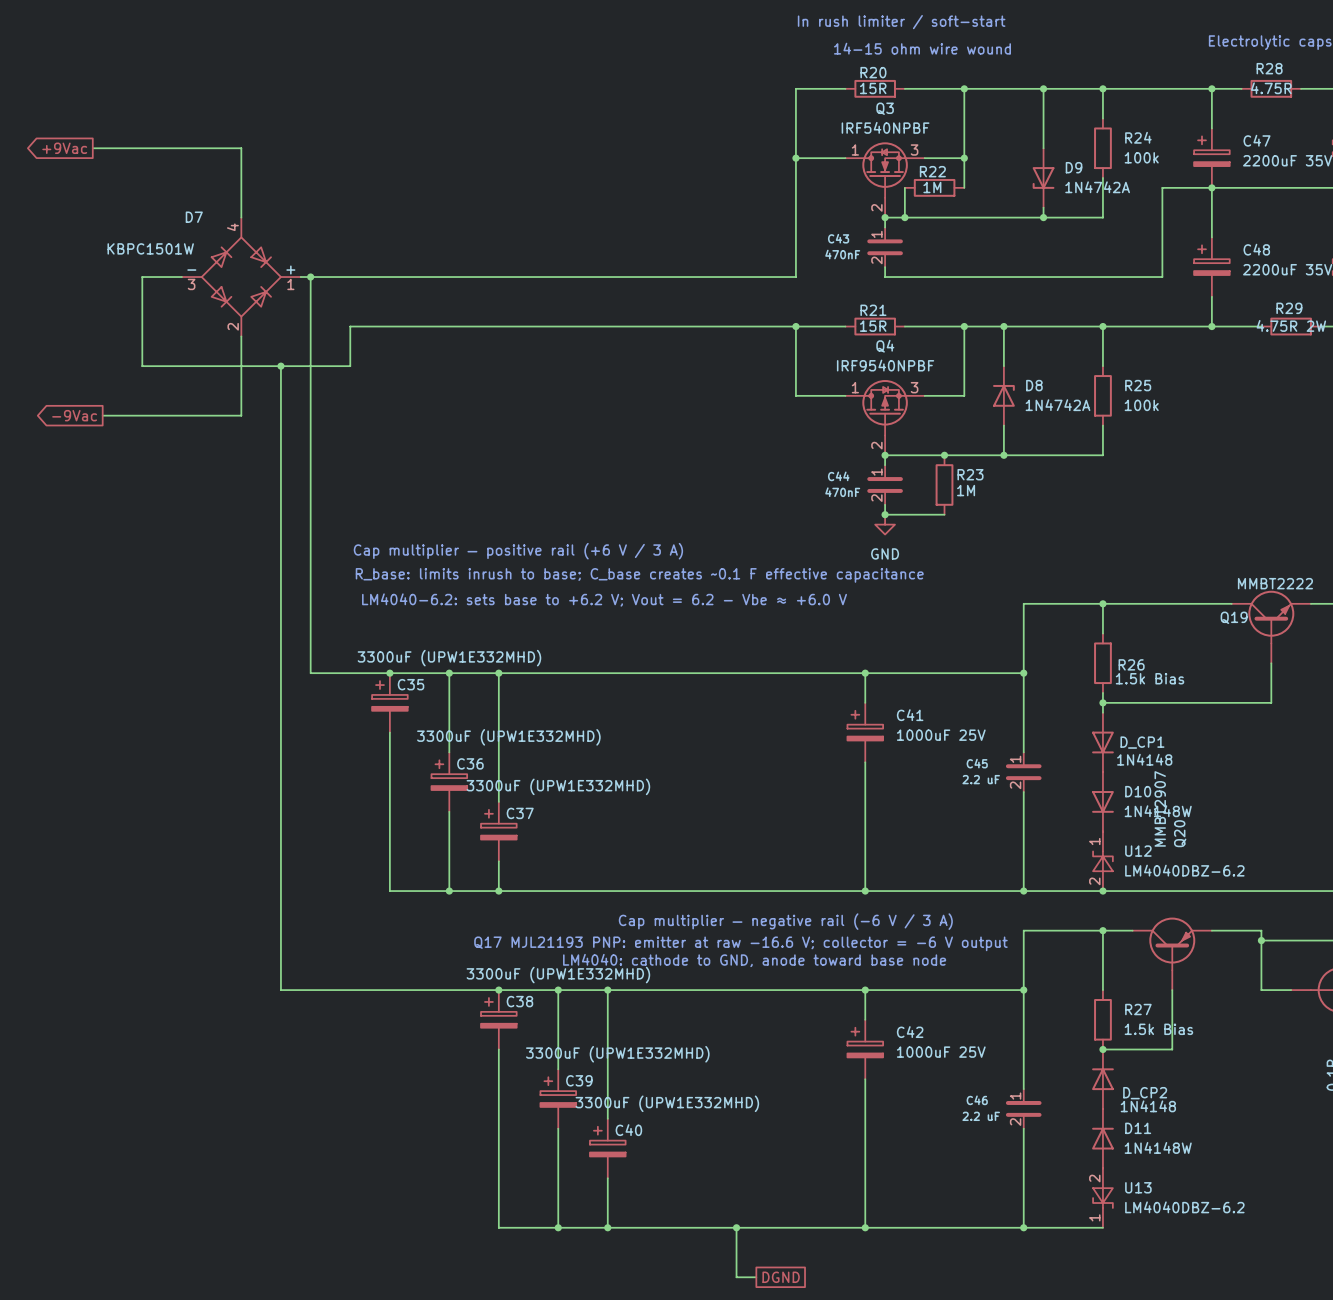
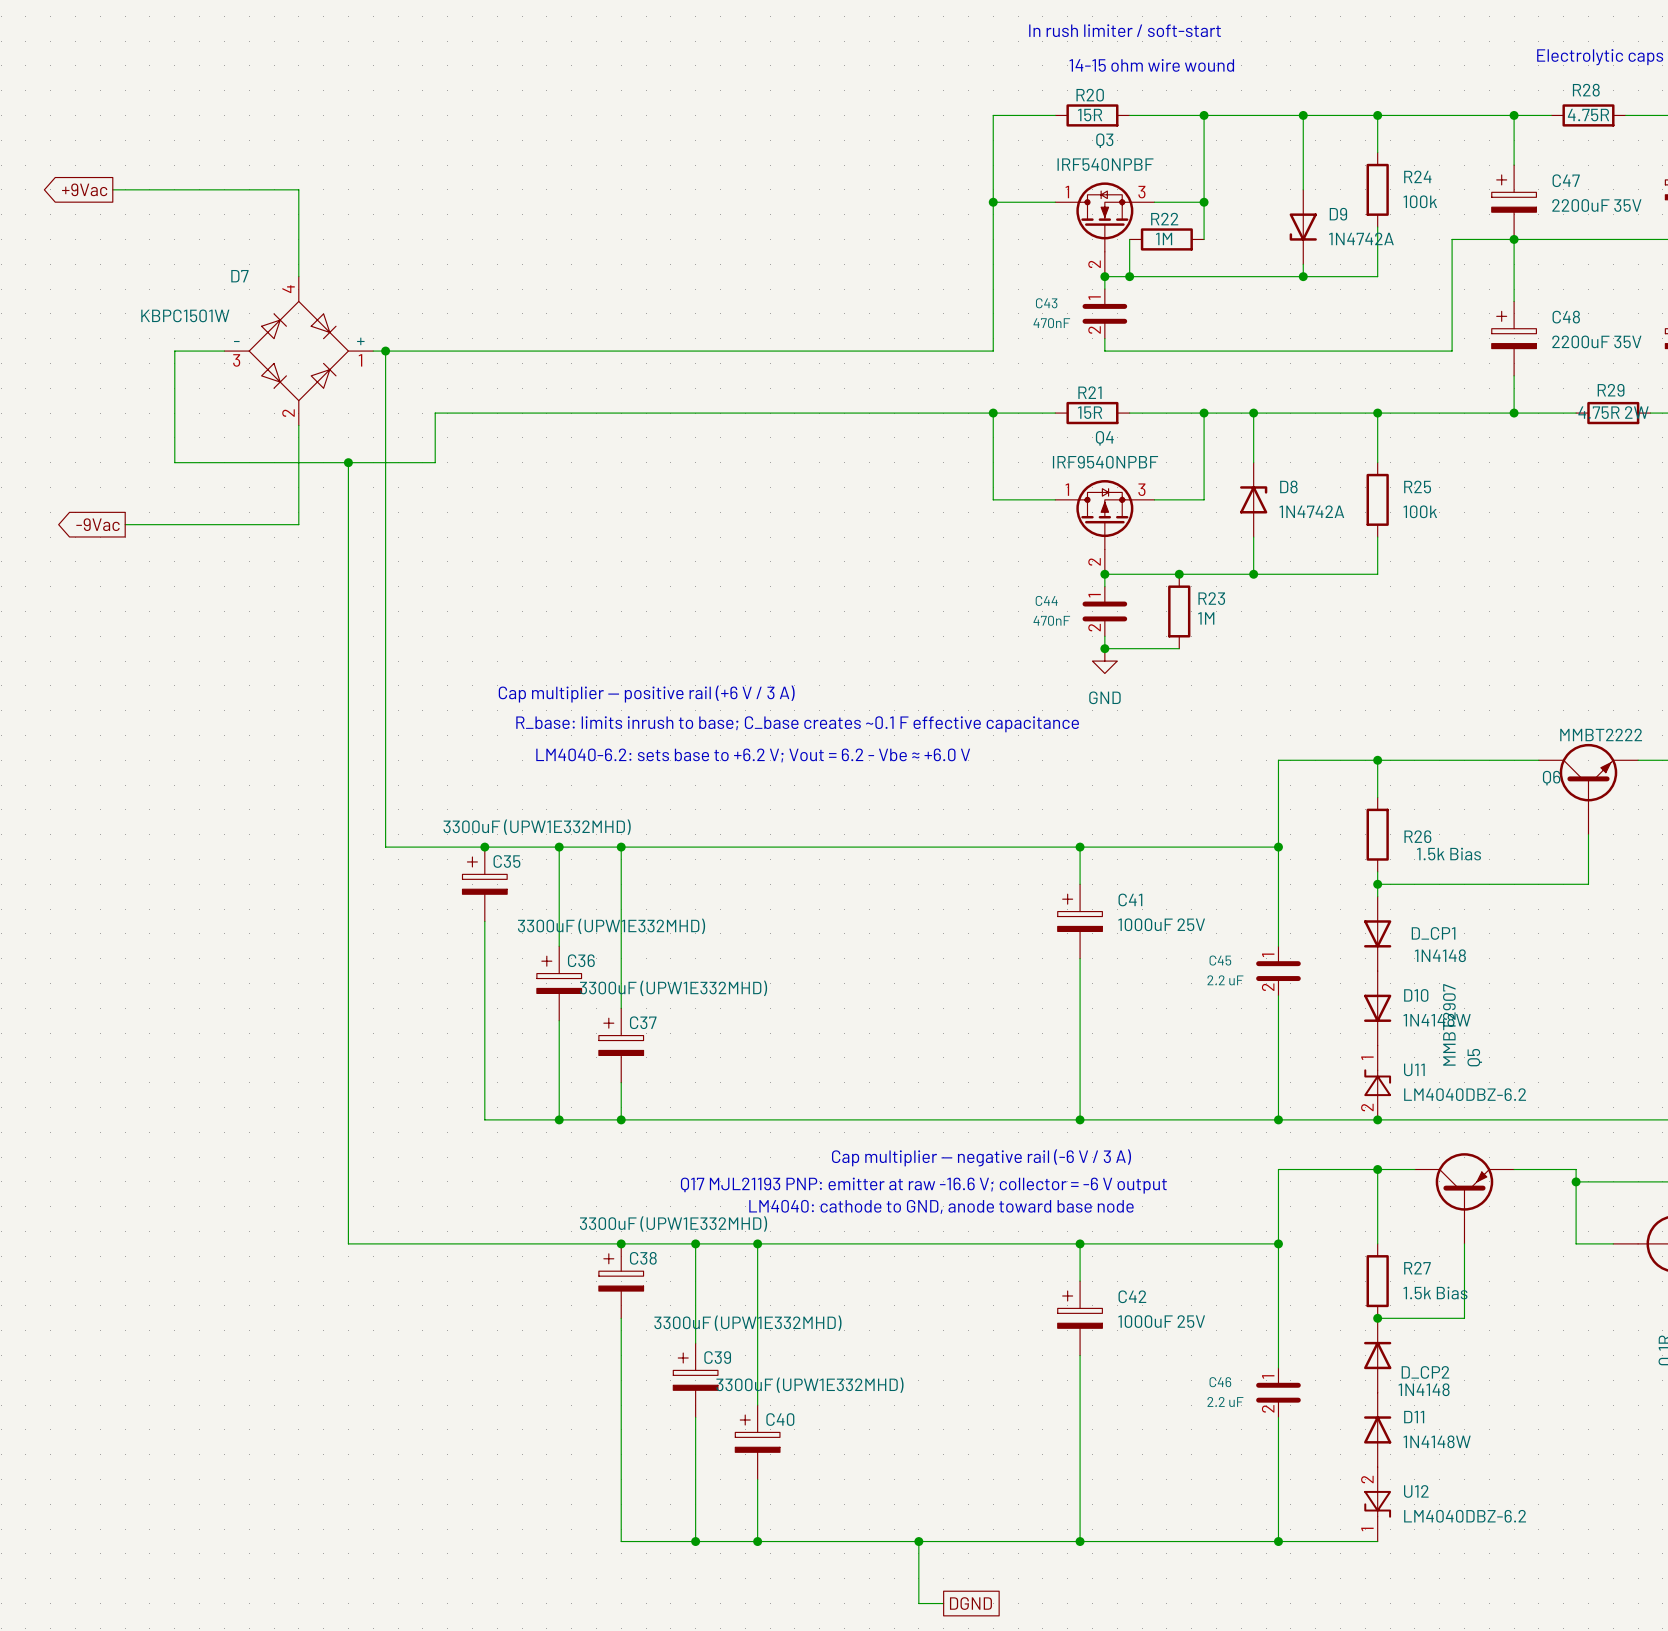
Q19 name: Q19 (1234, 617) -> Q6 (1551, 778)
Q20 name: Q20 (1180, 833) -> Q5 (1474, 1057)
U12 name: U12 (1138, 851) -> U11 (1414, 1069)
U13 name: U13 (1138, 1187) -> U12 (1416, 1491)

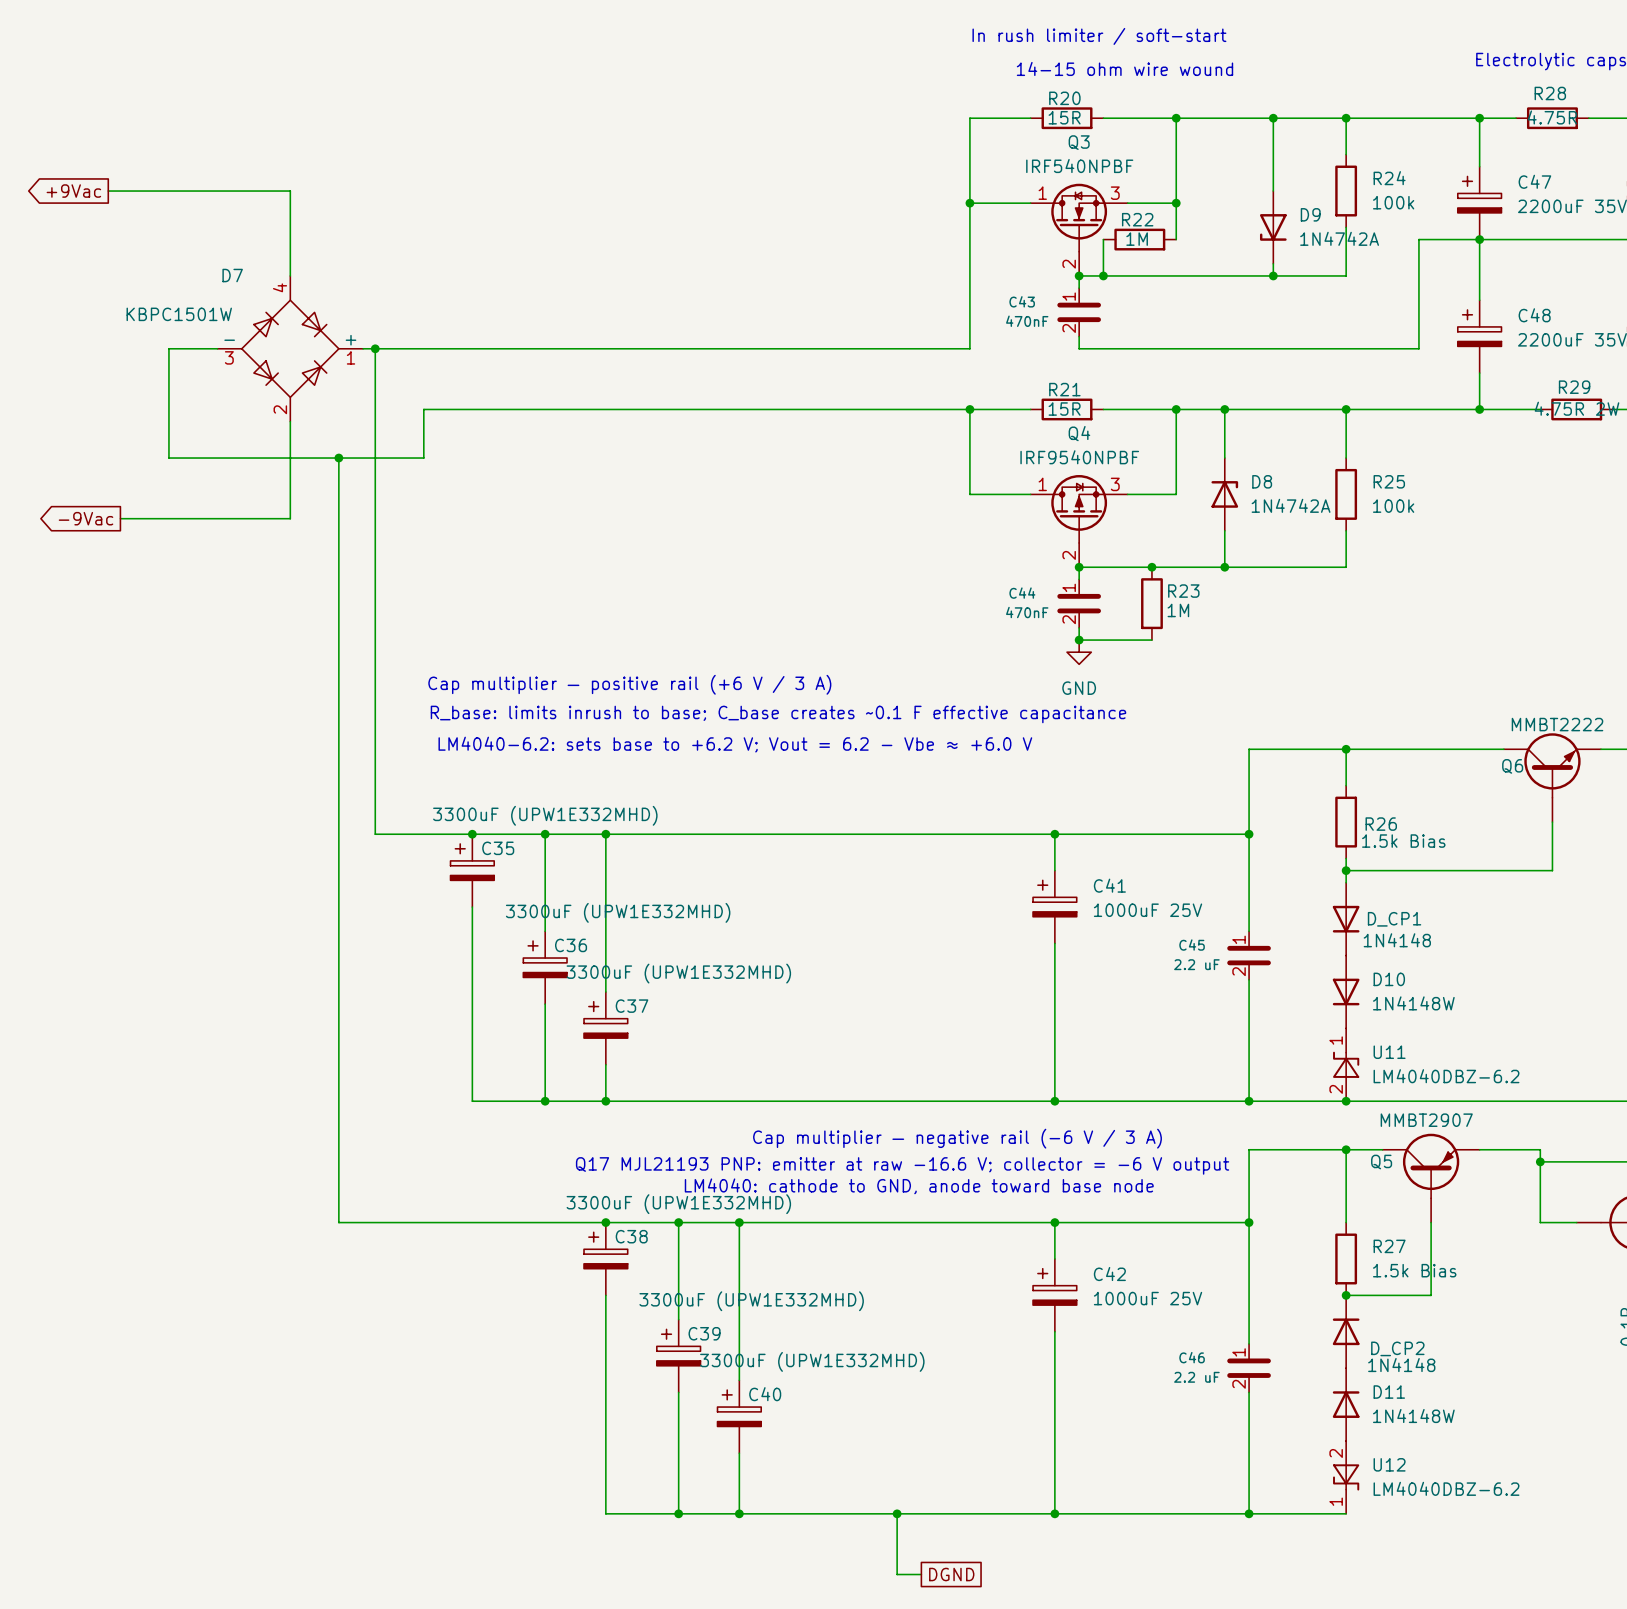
Q5 value rotation: 0° (1449, 1024) -> 90° clockwise (1426, 1120)
Q5 value position: MMBT2907 (1449, 1024) -> MMBT2907 (1426, 1120)
Q5 name rotation: 0° (1474, 1057) -> 90° clockwise (1381, 1162)
Q5 name position: Q5 (1474, 1057) -> Q5 (1381, 1162)

